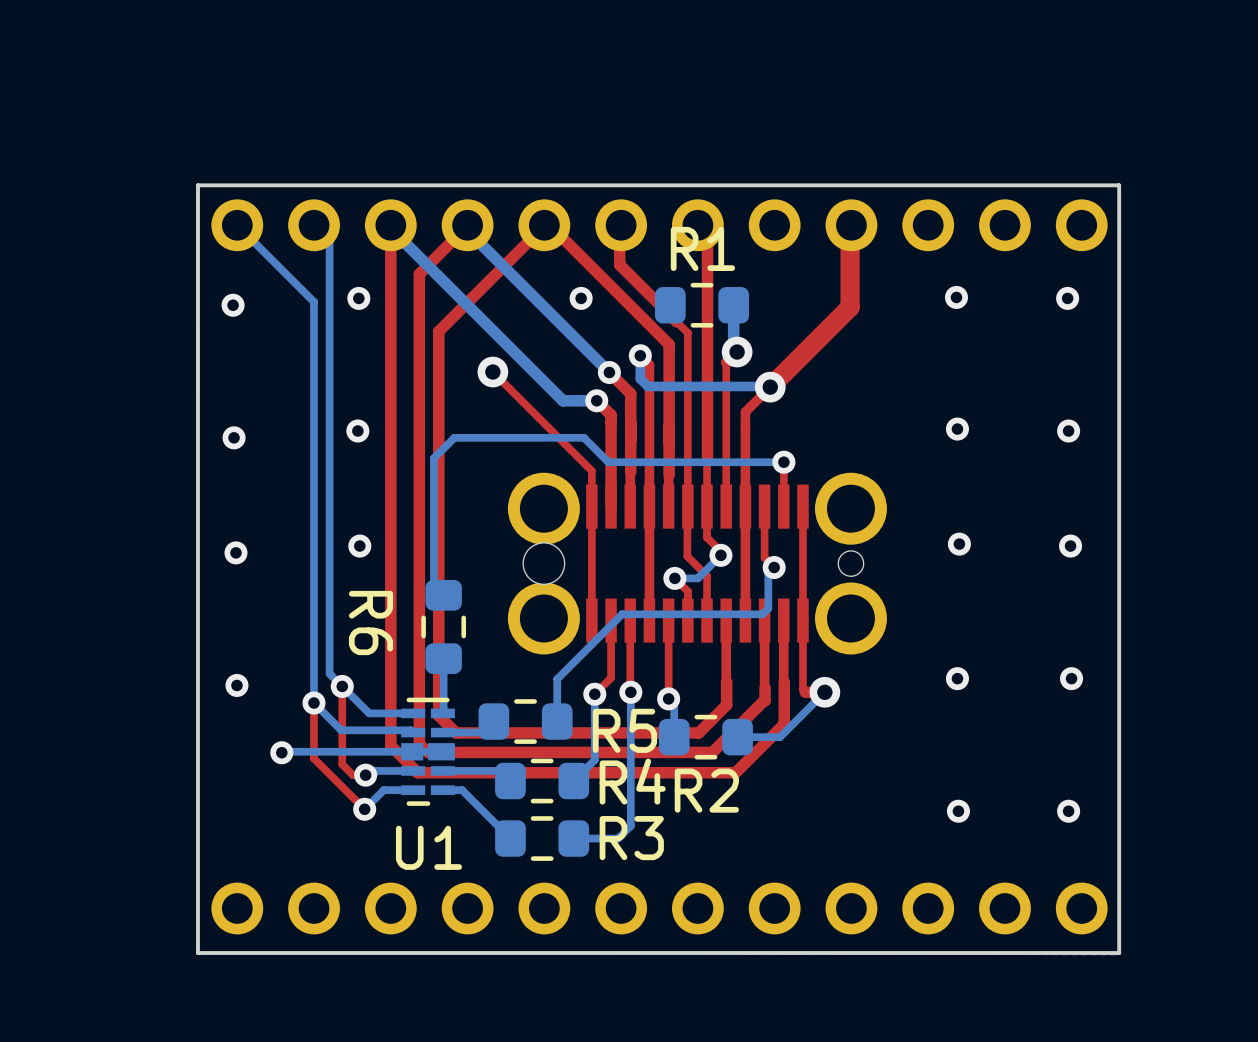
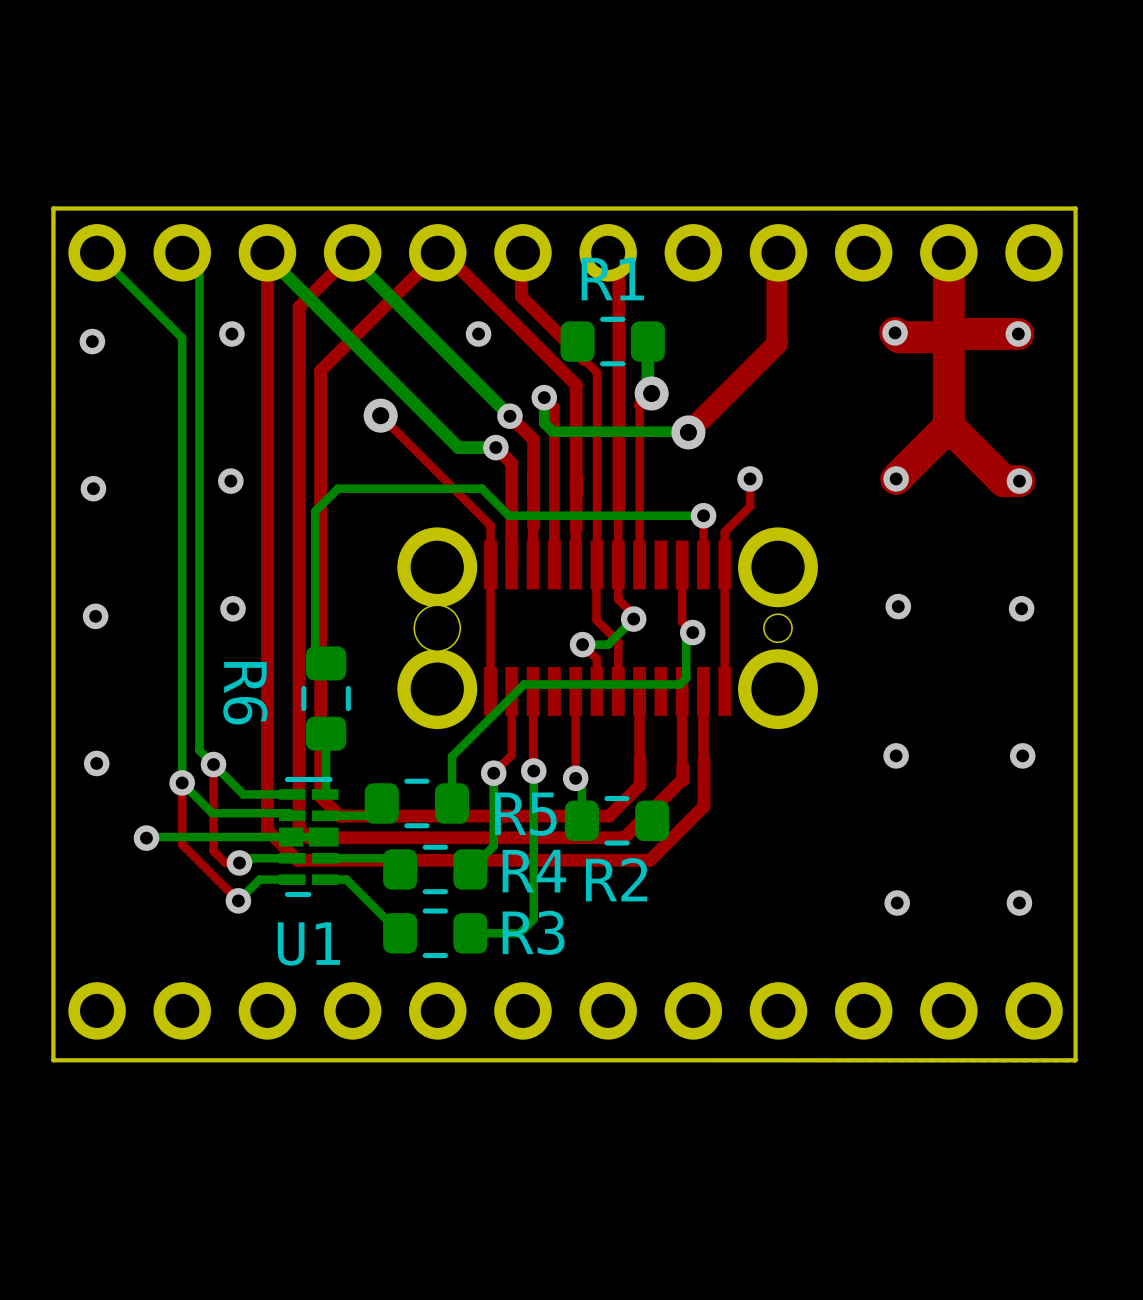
top track: none -> (948, 252) (948, 426)
top track: none -> (895, 332) (899, 337) (948, 337) (952, 333) (1018, 333)
top track: none -> (948, 426) (1003, 481) (1019, 481)
top track: none -> (948, 426) (896, 478)
top track: (770, 387) (745, 411) (745, 620) -> none
top track: none -> (750, 478) (750, 506) (724, 531) (724, 564)
via: none -> (750, 478)
top track: (649, 506) (649, 620) -> none
top track: (802, 620) (802, 689) (805, 692) (824, 692) -> none
bottom track: (824, 692) (780, 737) (737, 737) -> none
via: (824, 692) -> none

